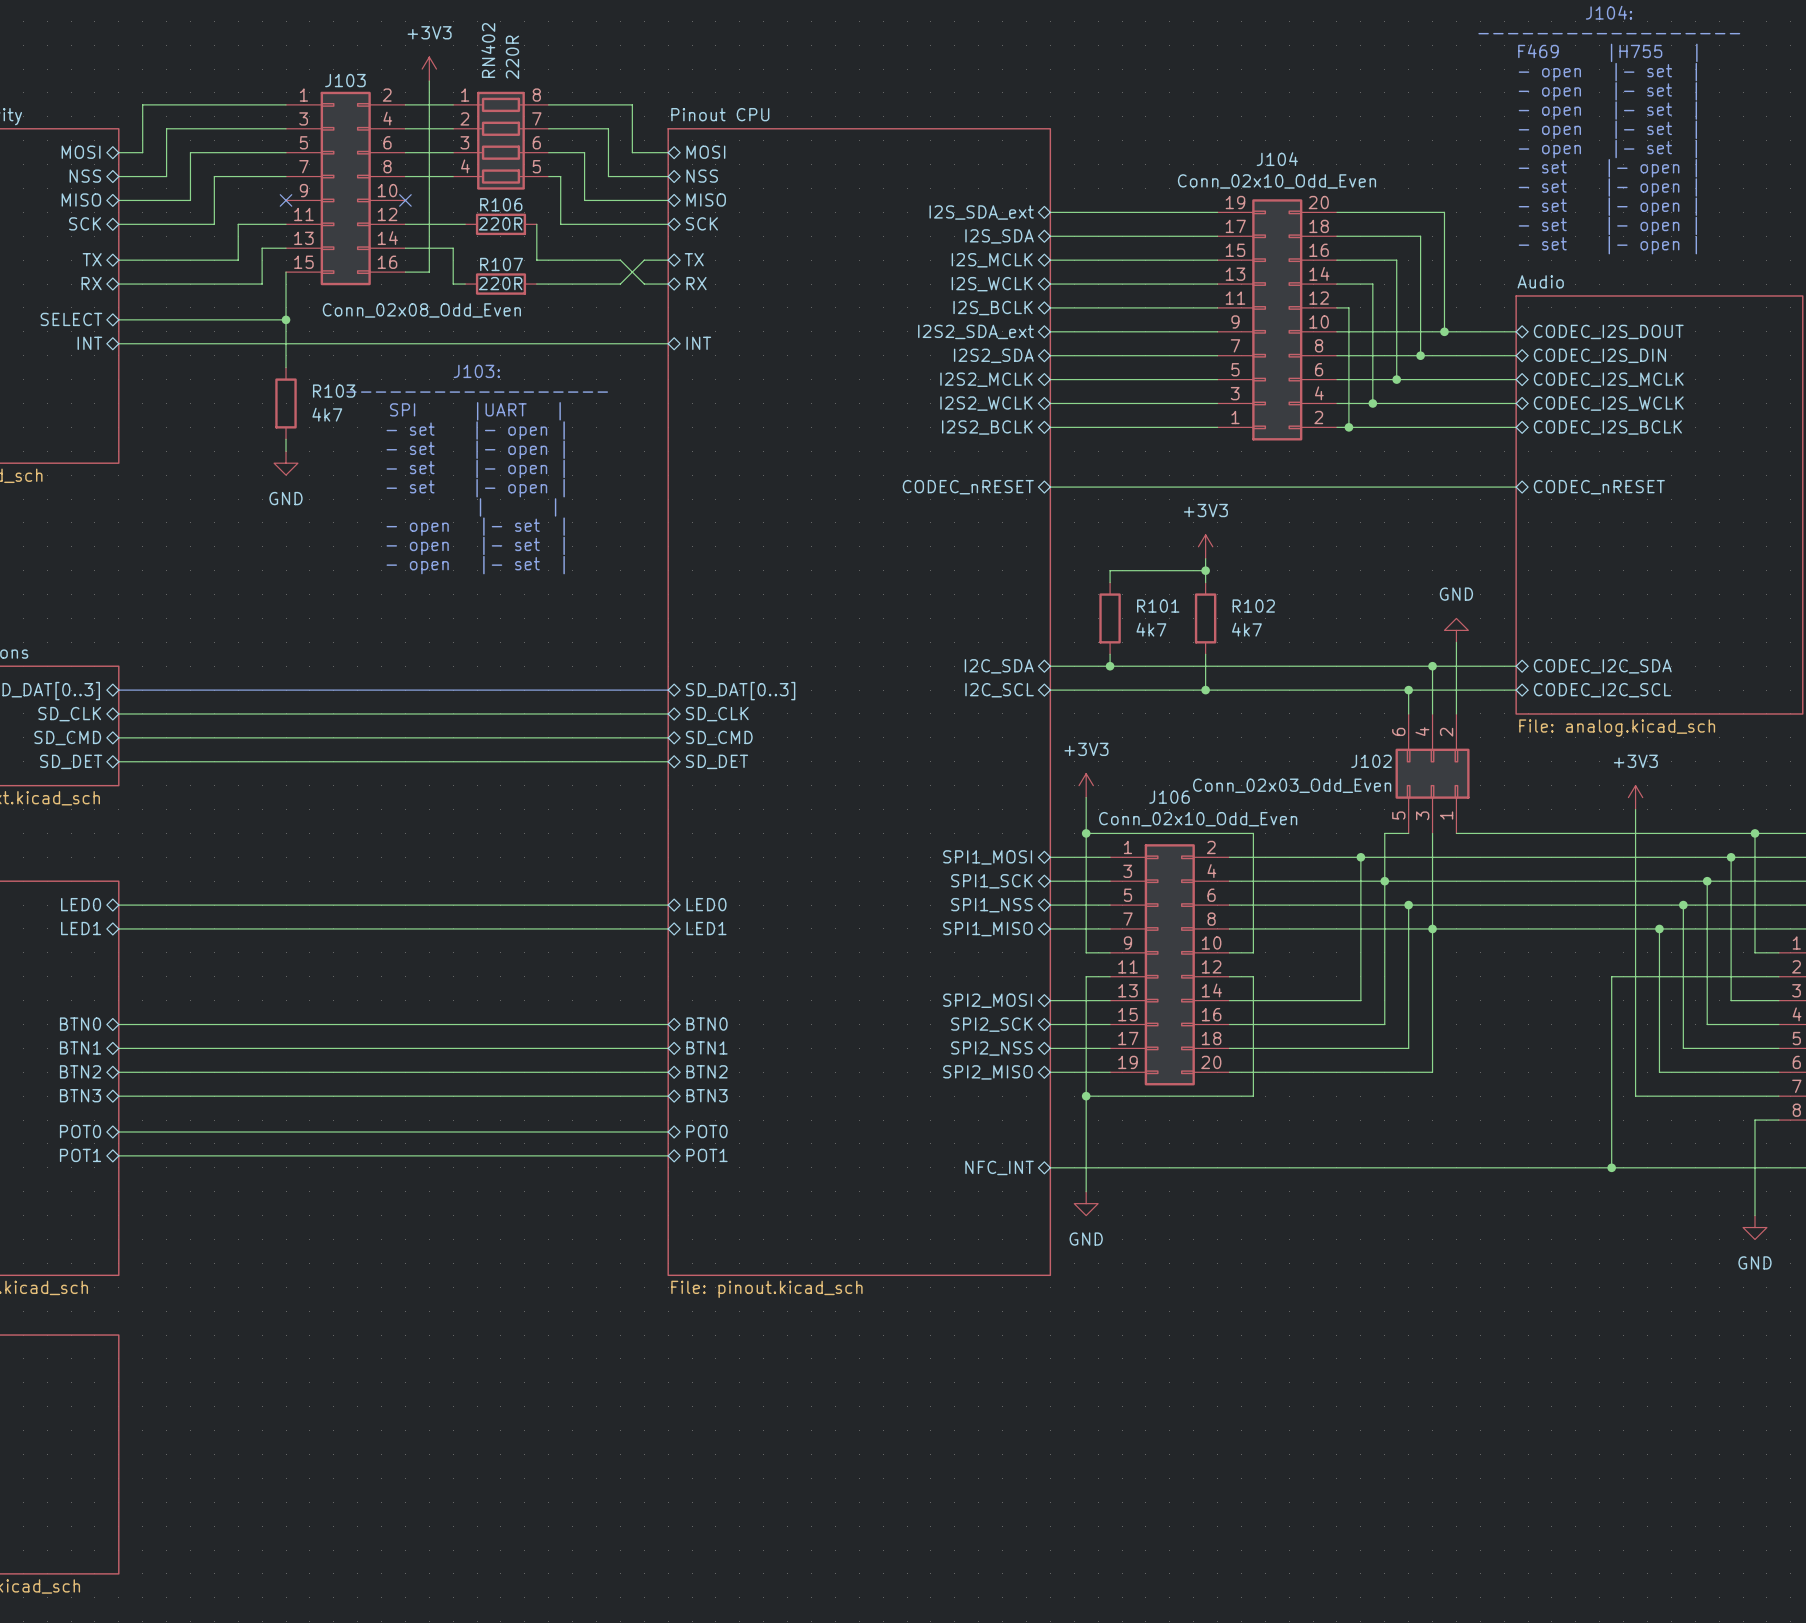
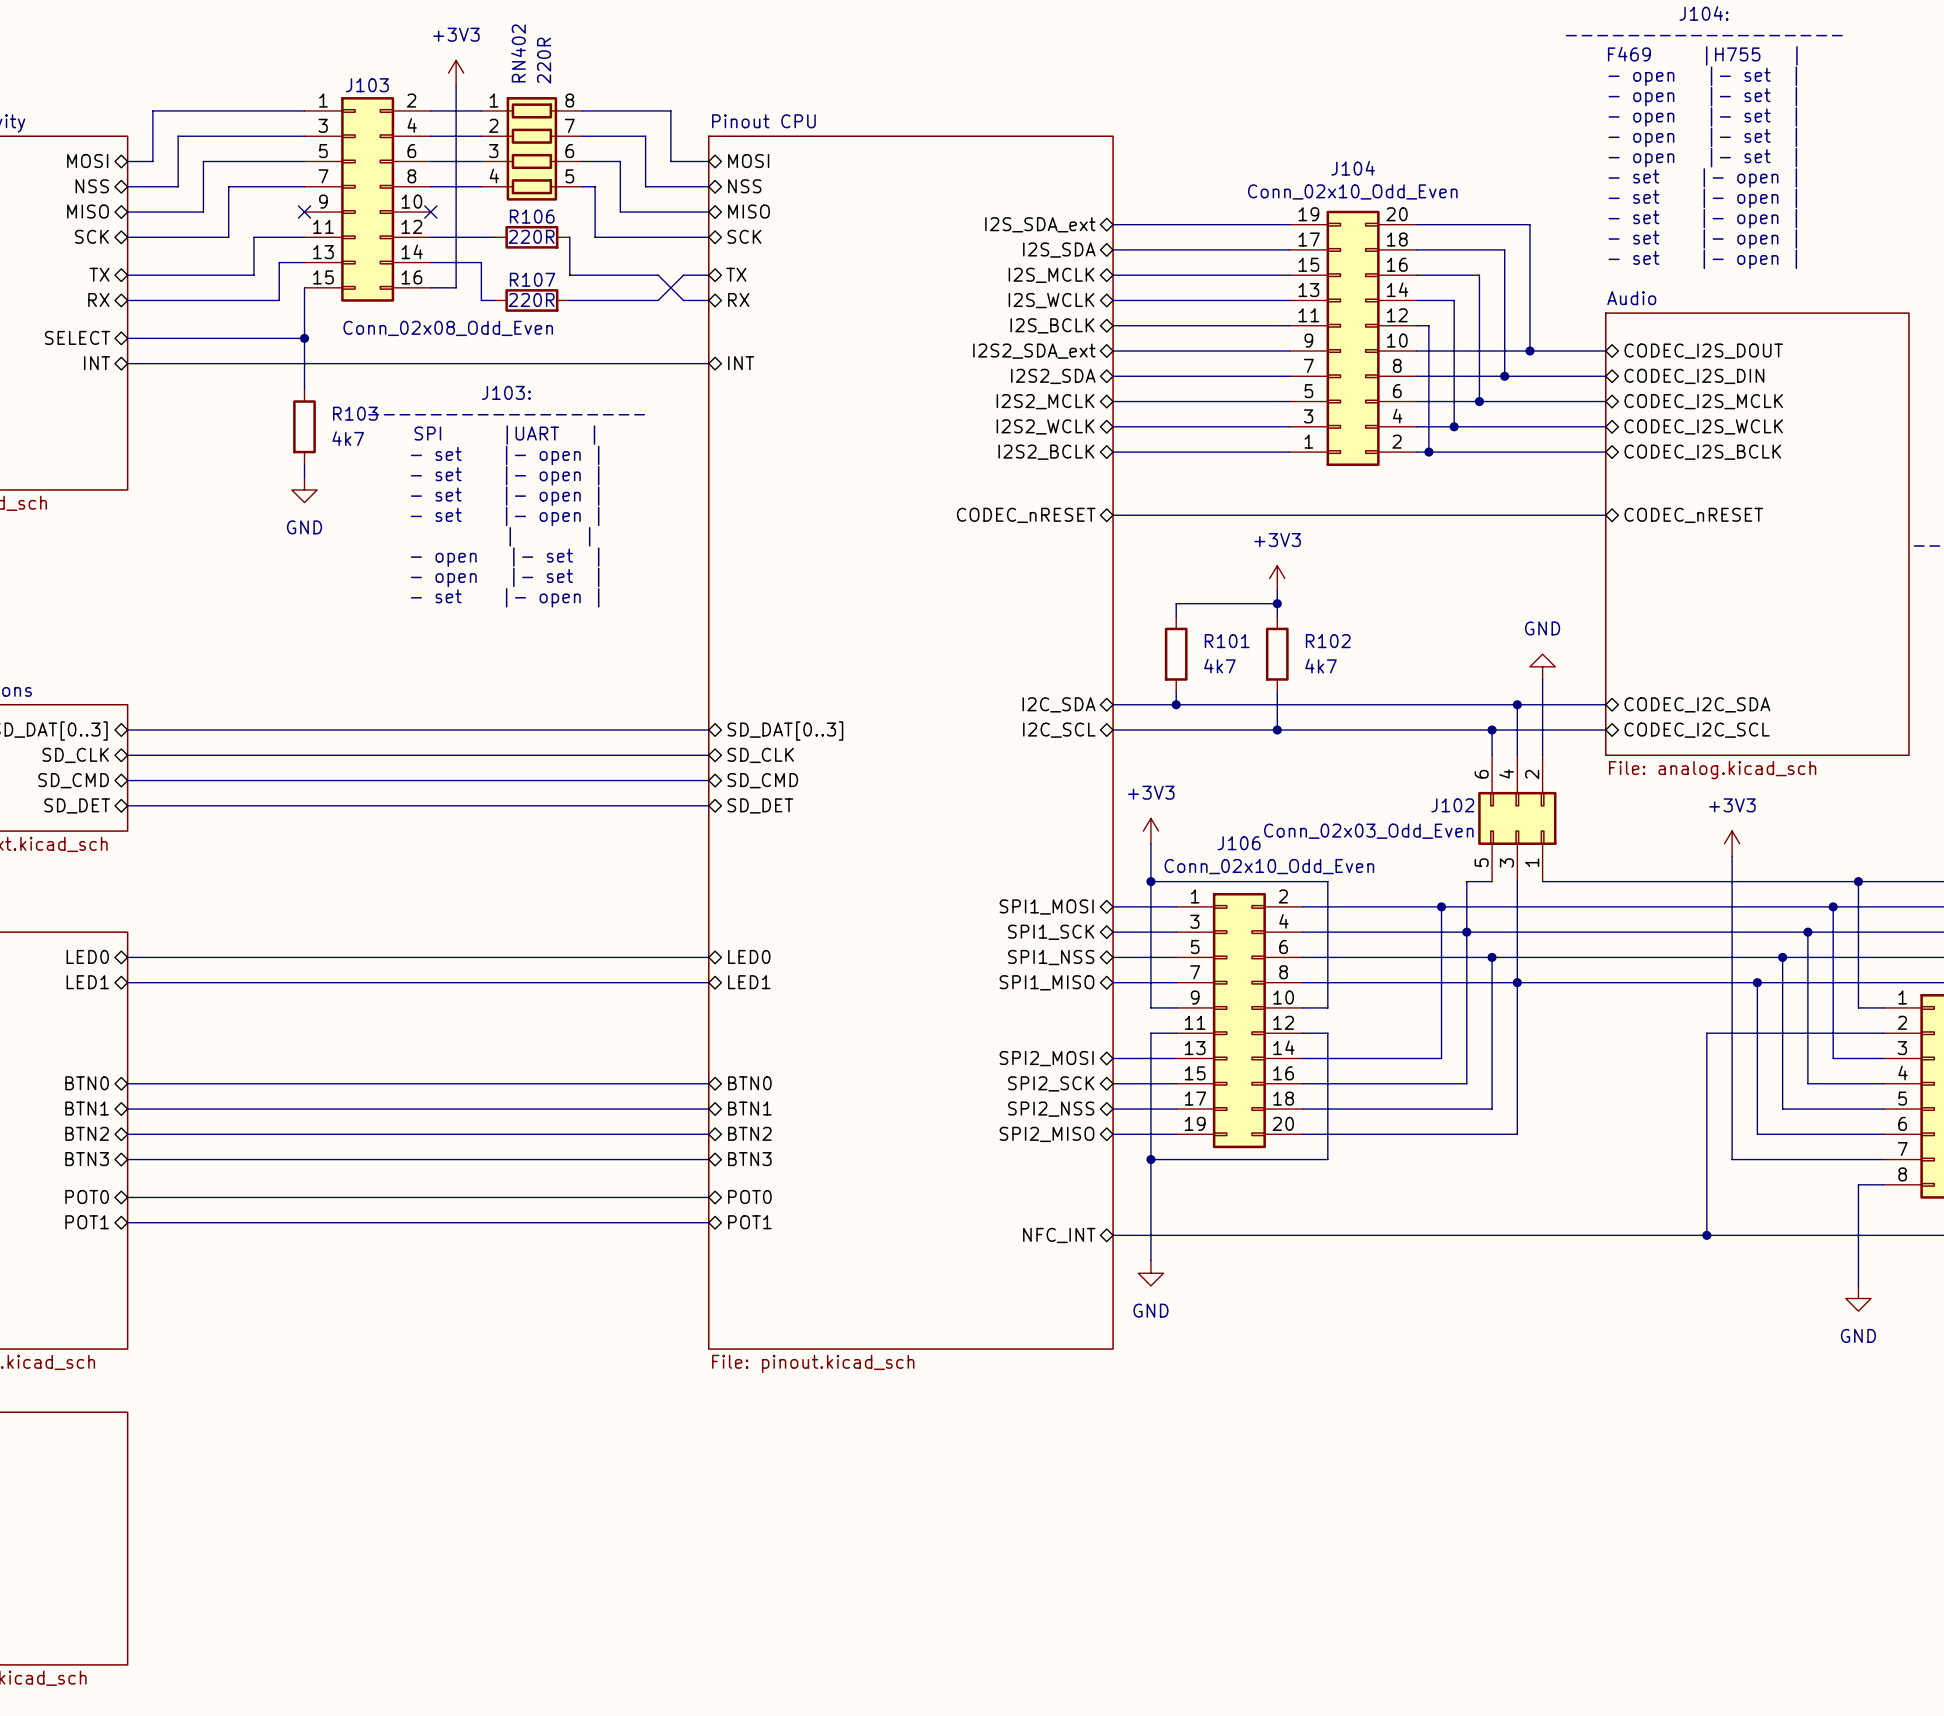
text: - open |- set | (475, 565) -> - set |- open | (505, 597)

